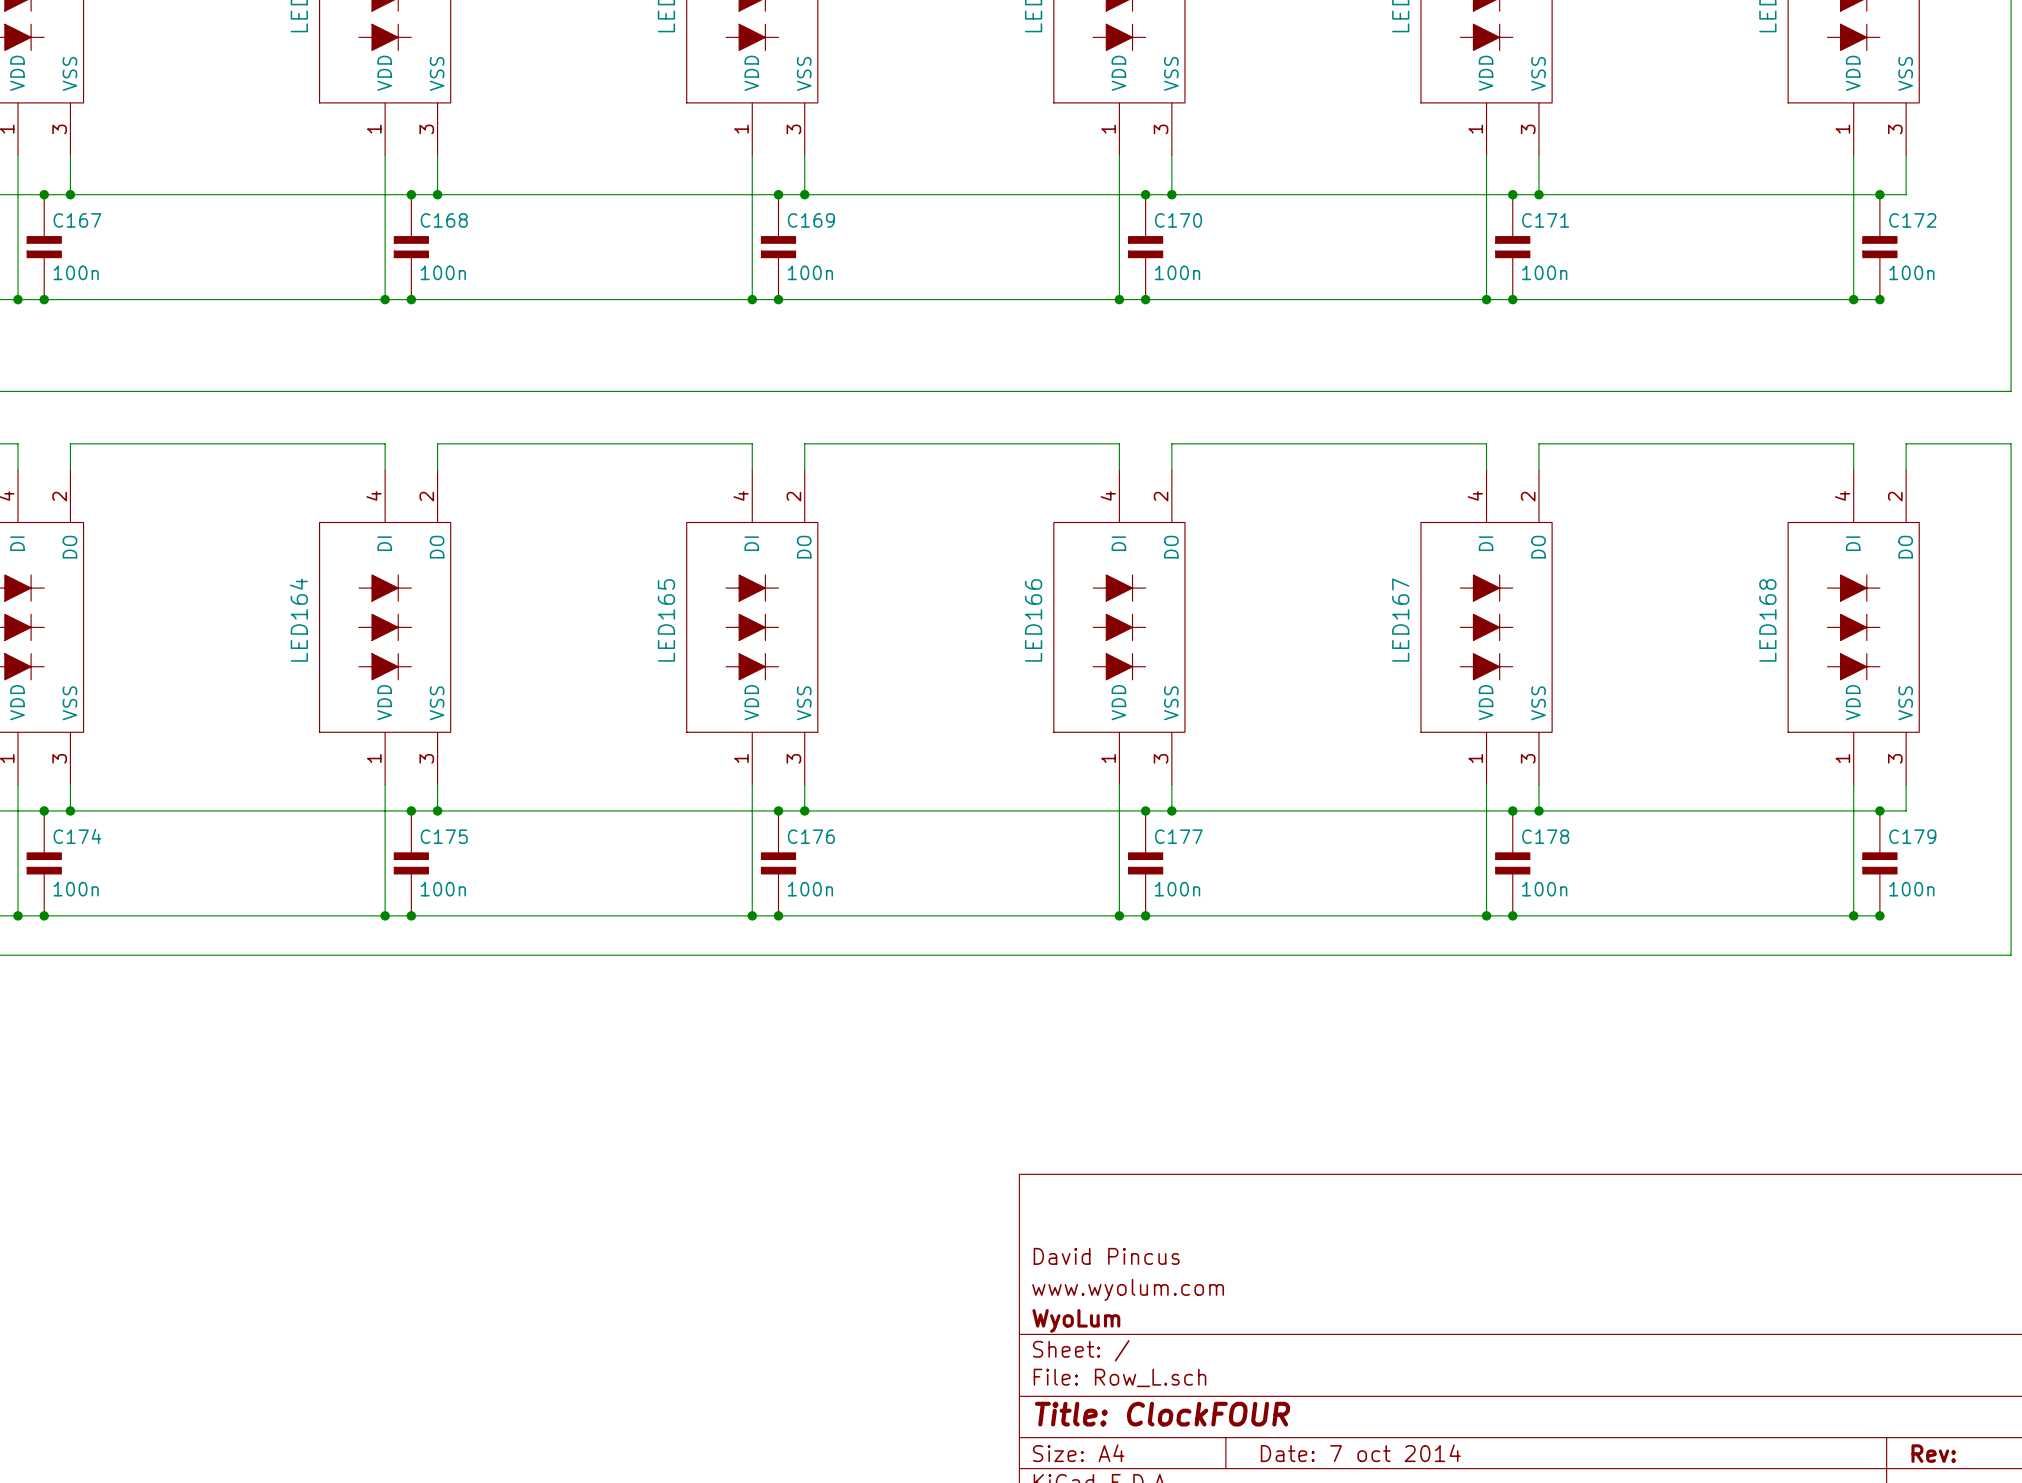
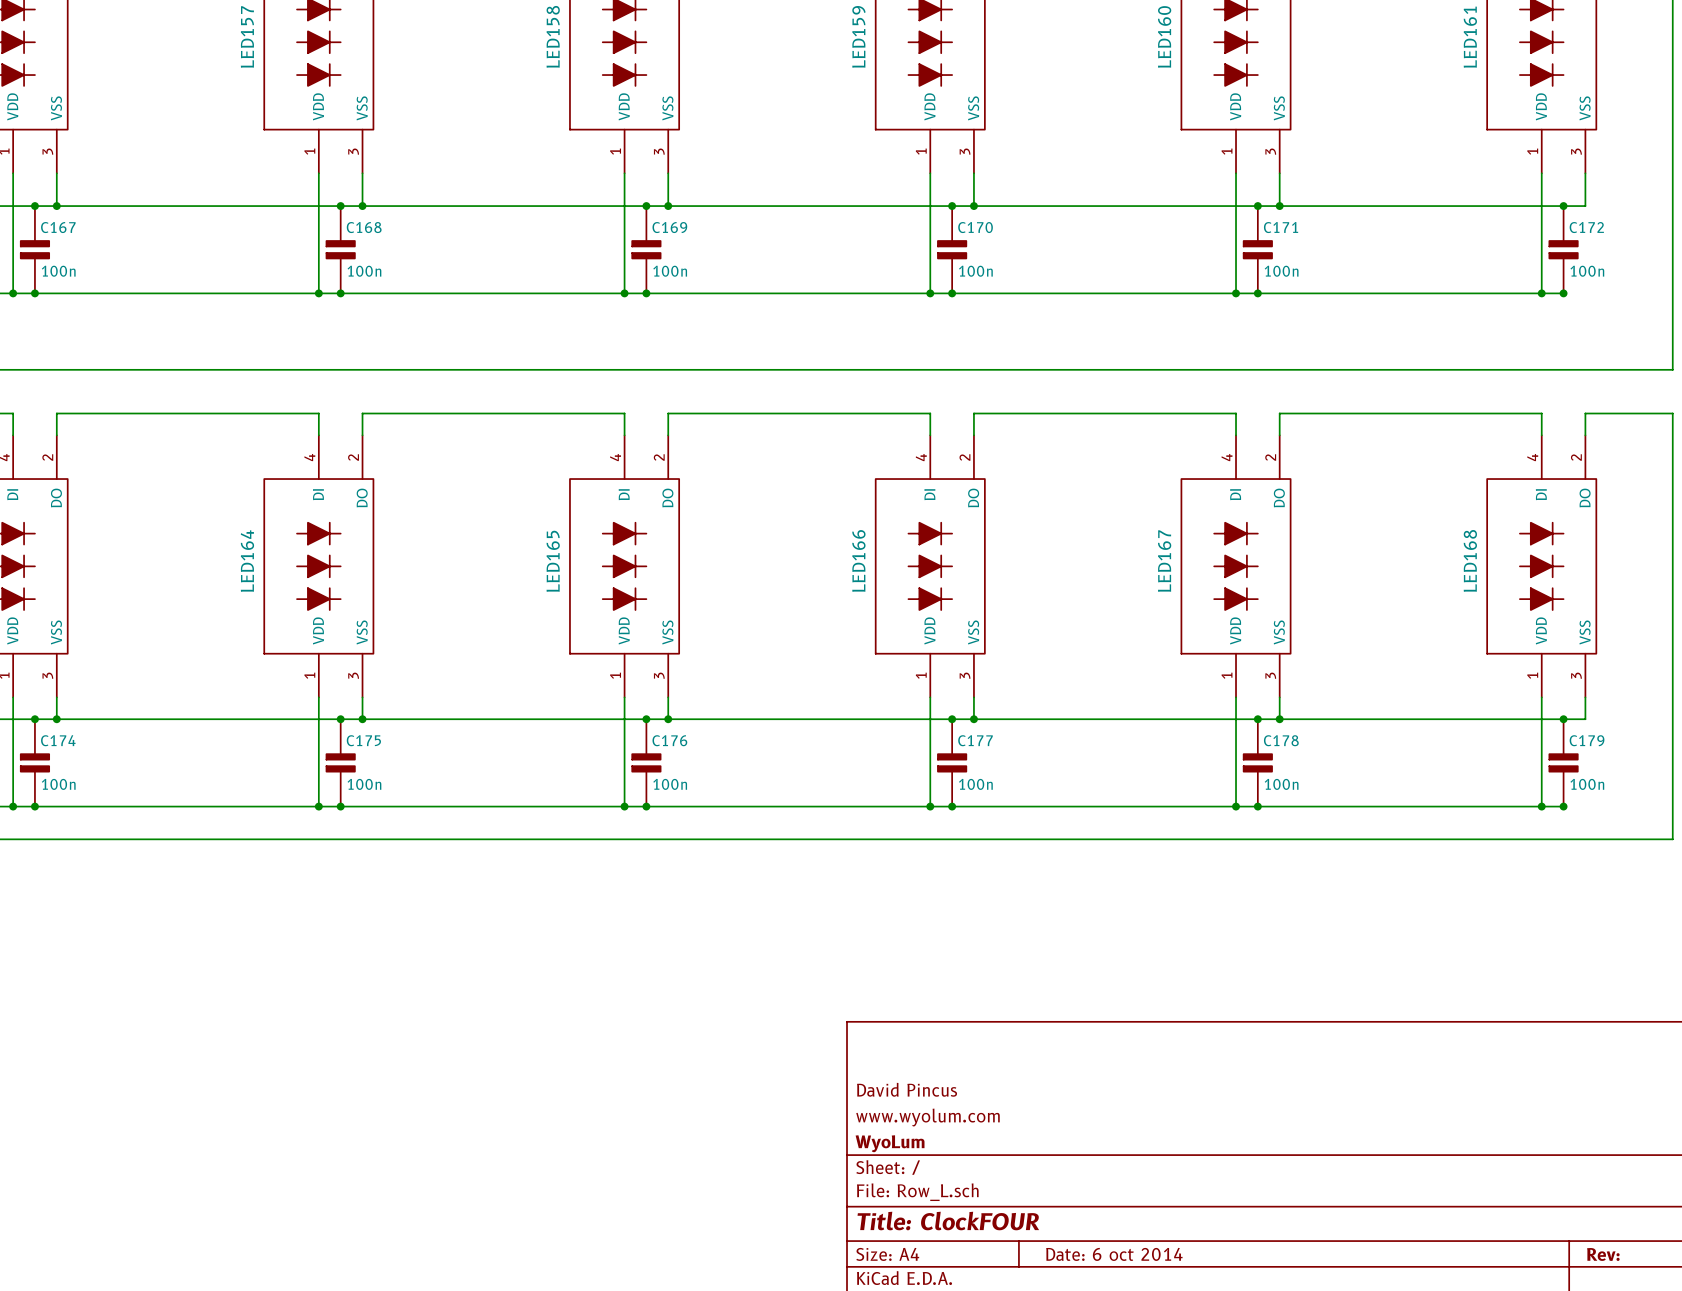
title block: Date: 7 oct 2014 (1360, 1453) -> Date: 6 oct 2014 (1114, 1254)

